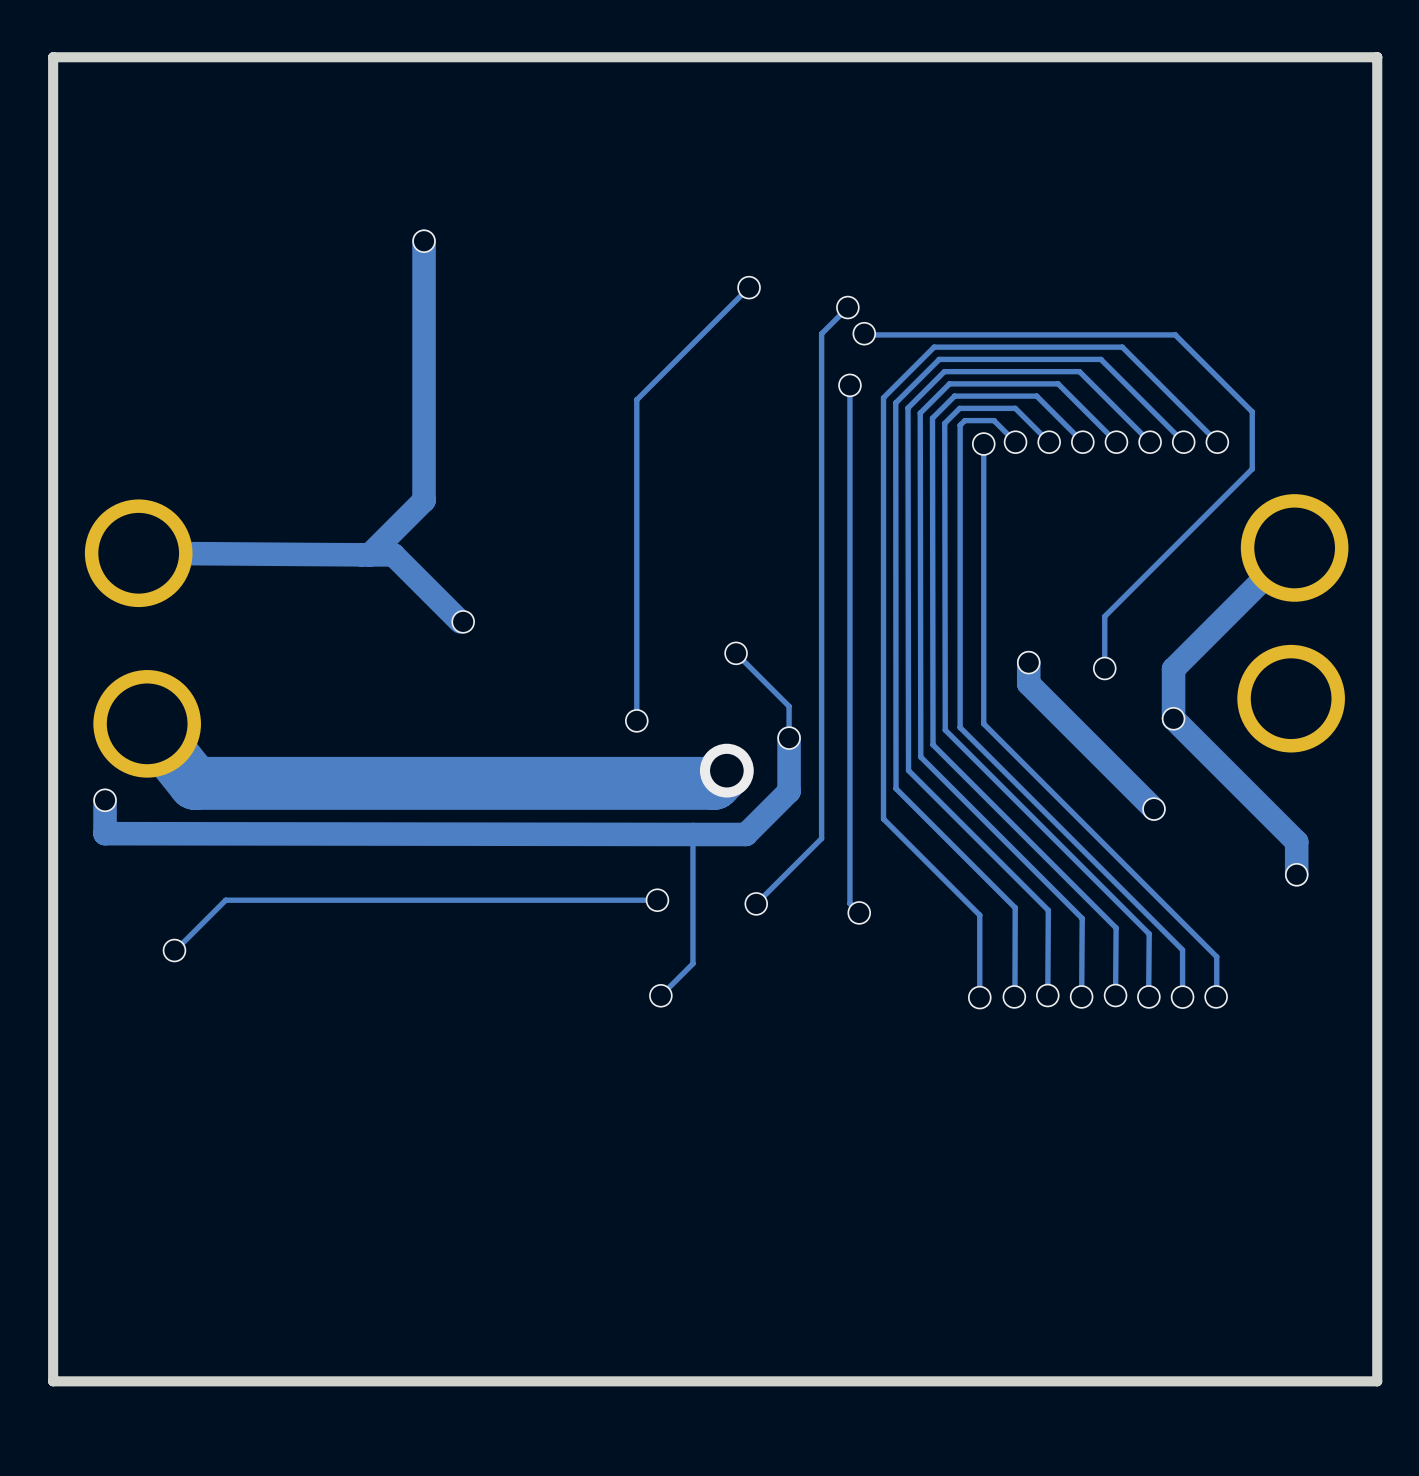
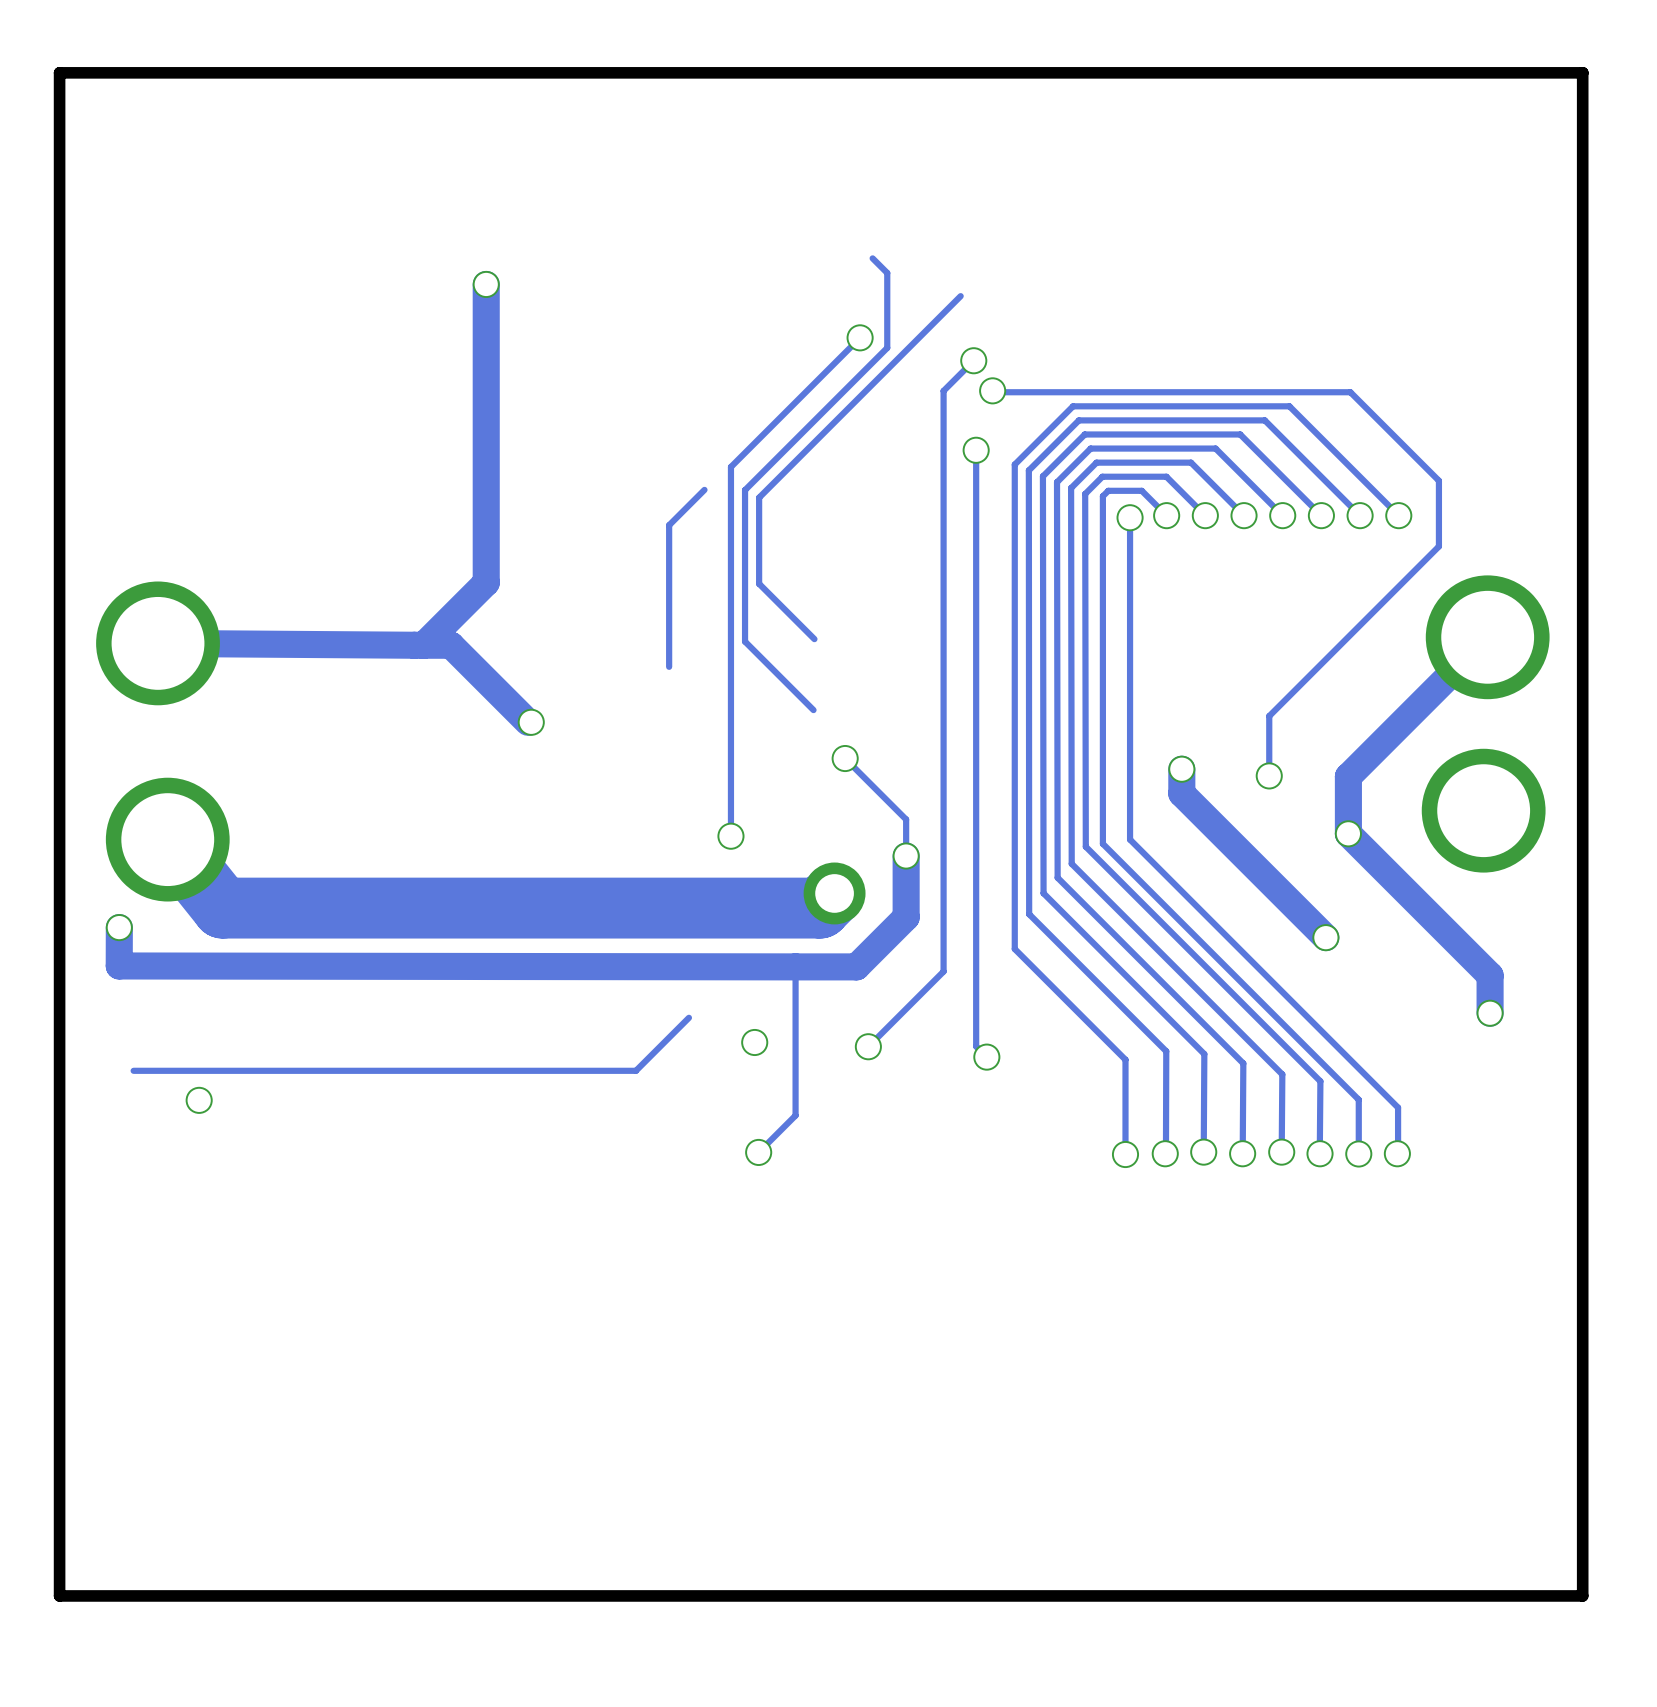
track: none -> (872, 258) (887, 273) (887, 347) (745, 490) (745, 641) (813, 710)
track: none -> (960, 296) (759, 497) (759, 583) (814, 639)
track: none -> (704, 489) (669, 525) (669, 666)
track: none -> (688, 1017) (635, 1070) (133, 1070)
track: (657, 900) (225, 900) (174, 950) -> none

